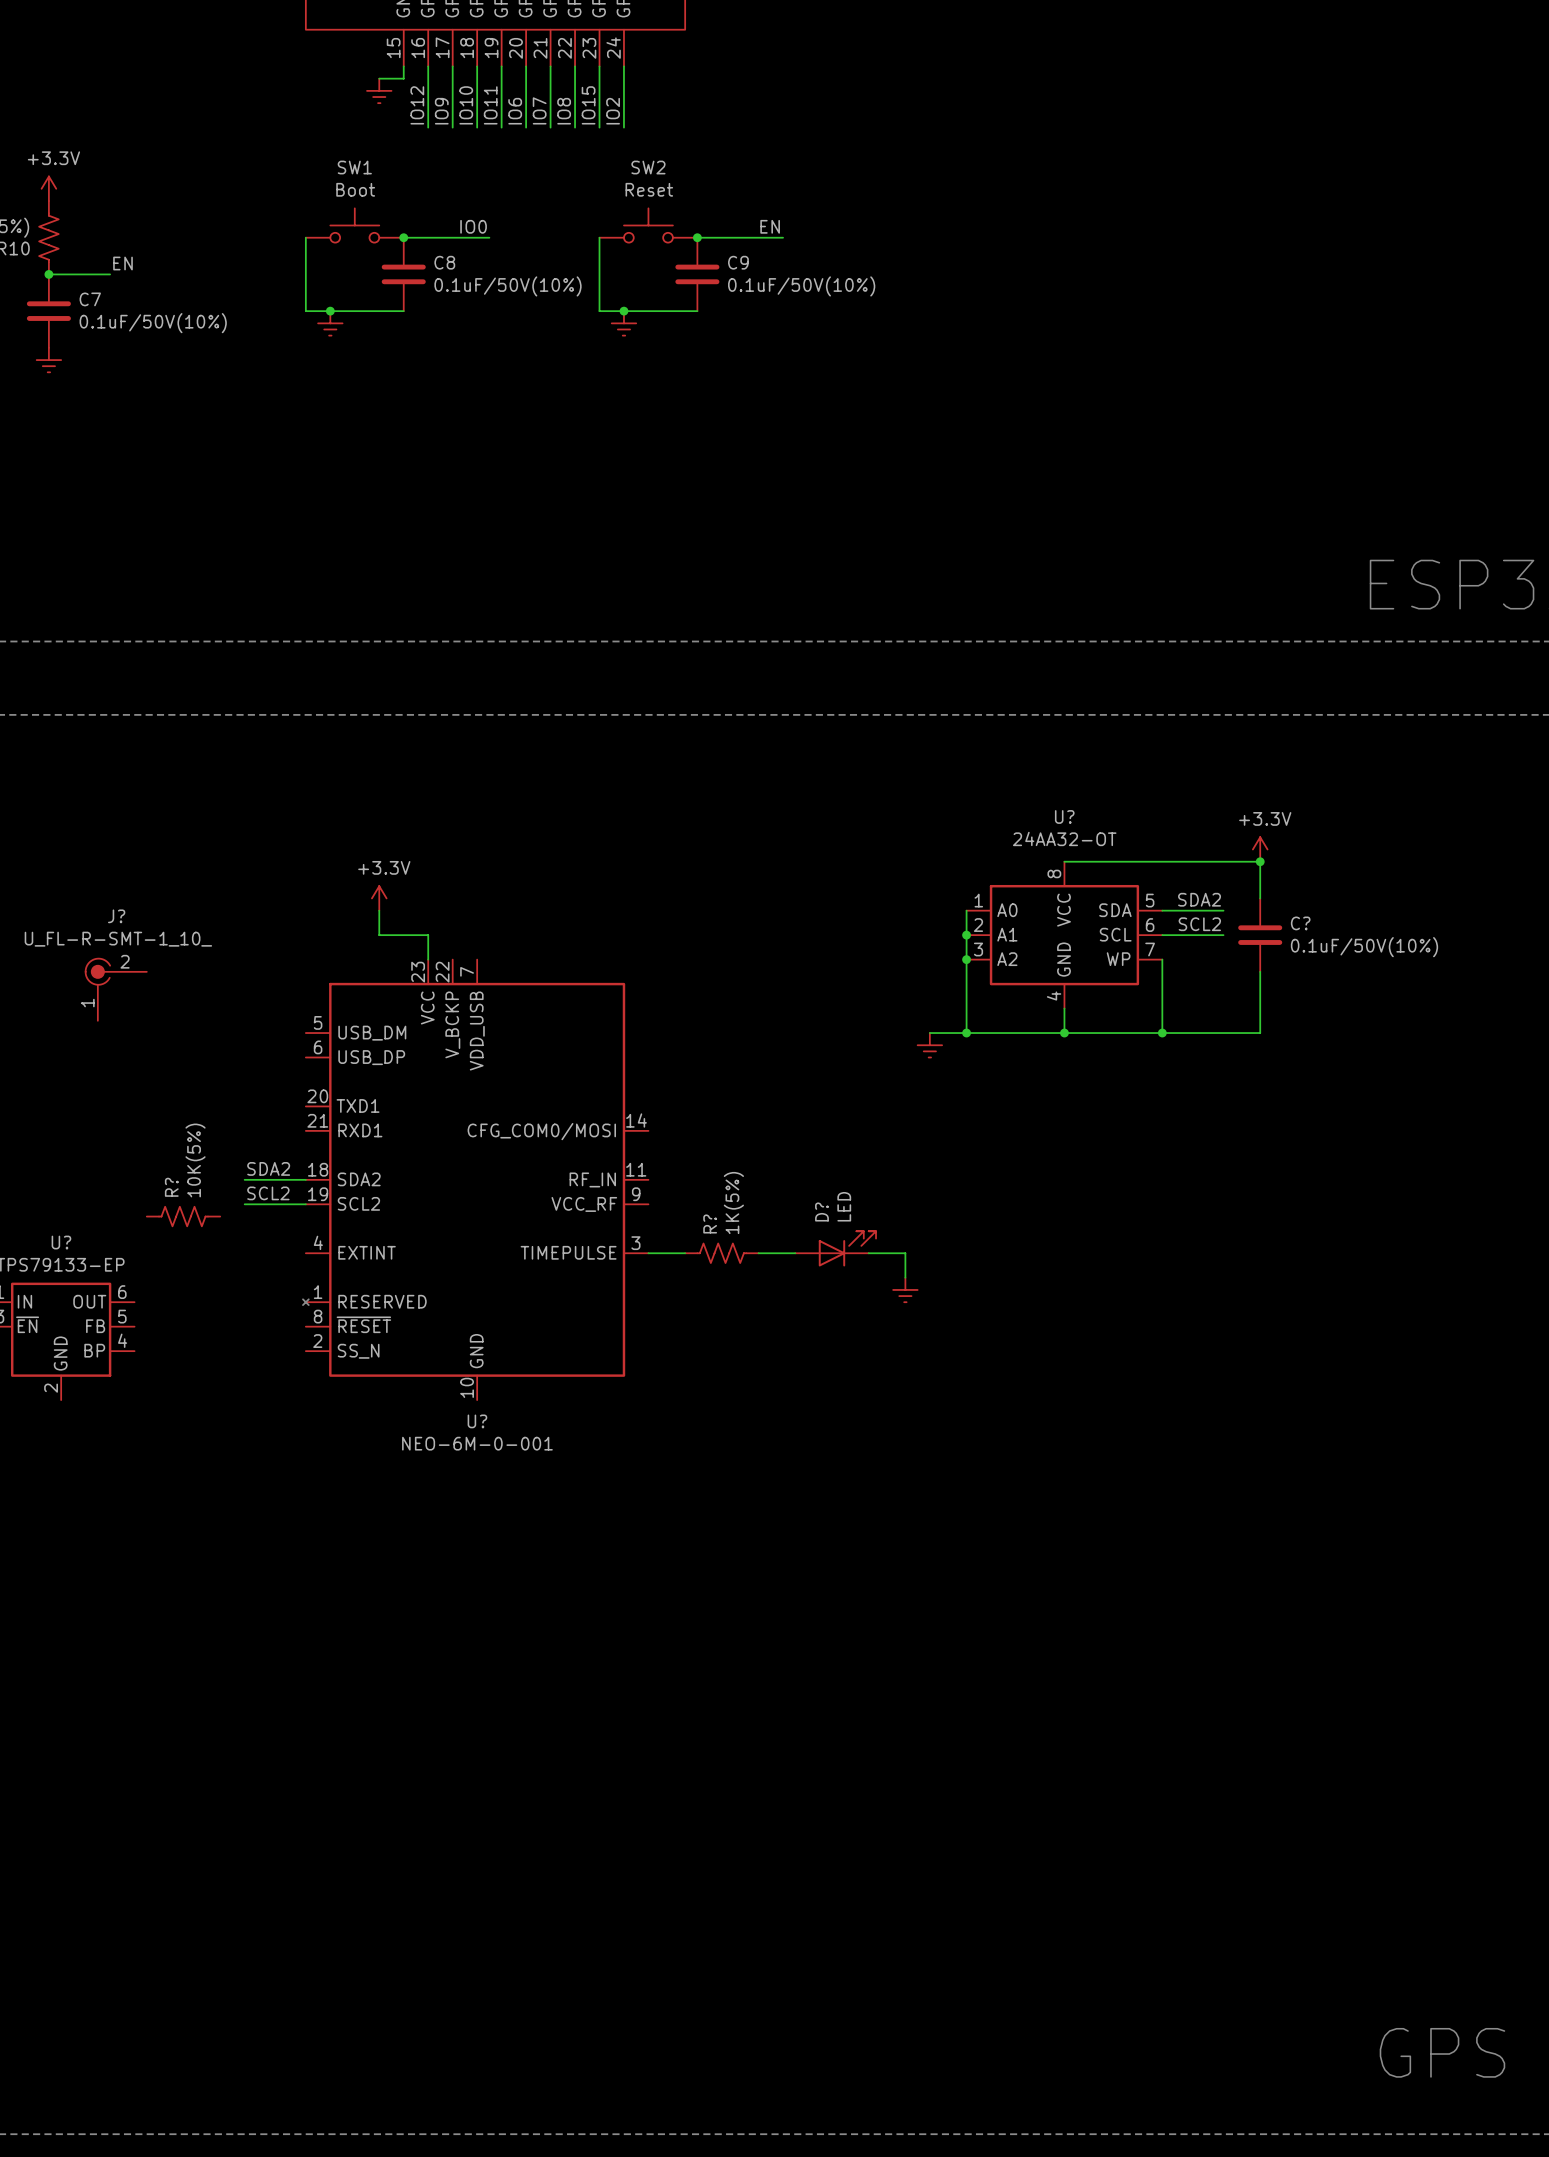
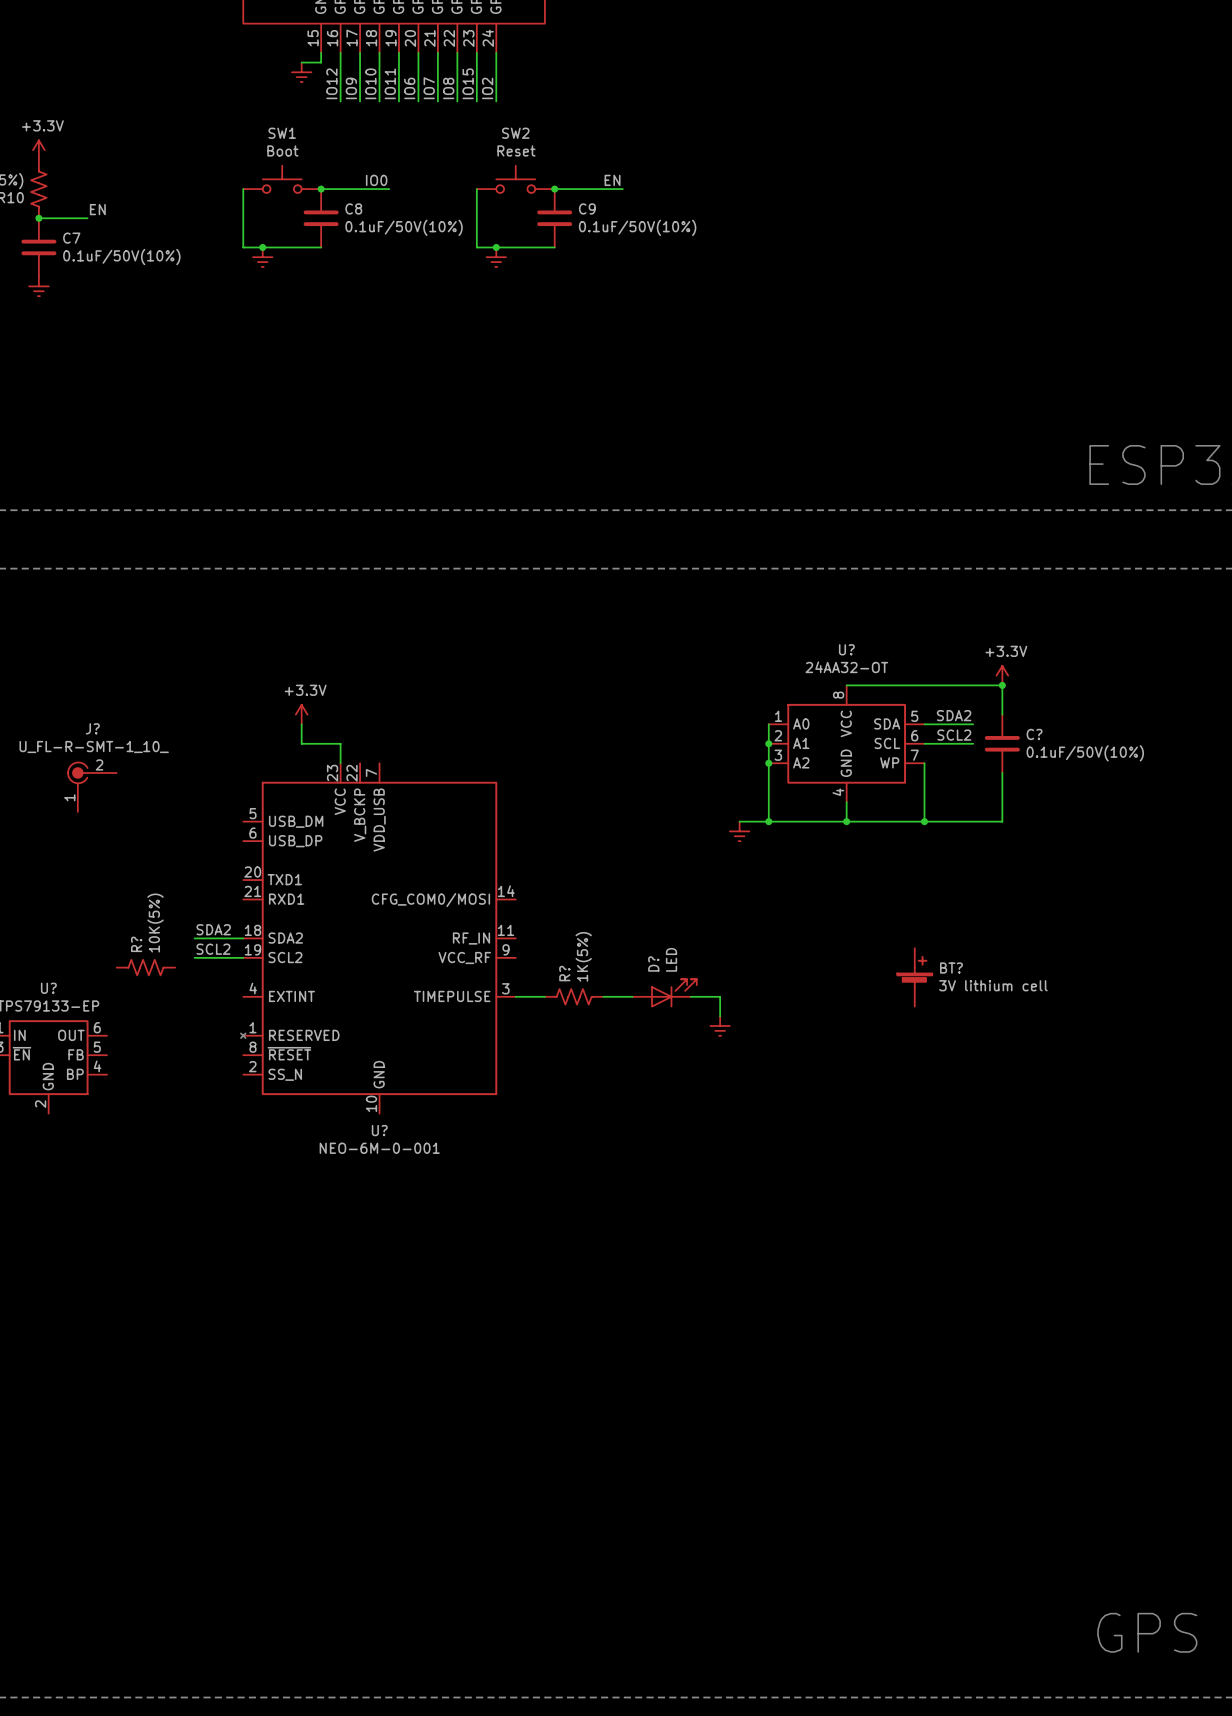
BT?: none -> 3V lithium cell (914, 977)

